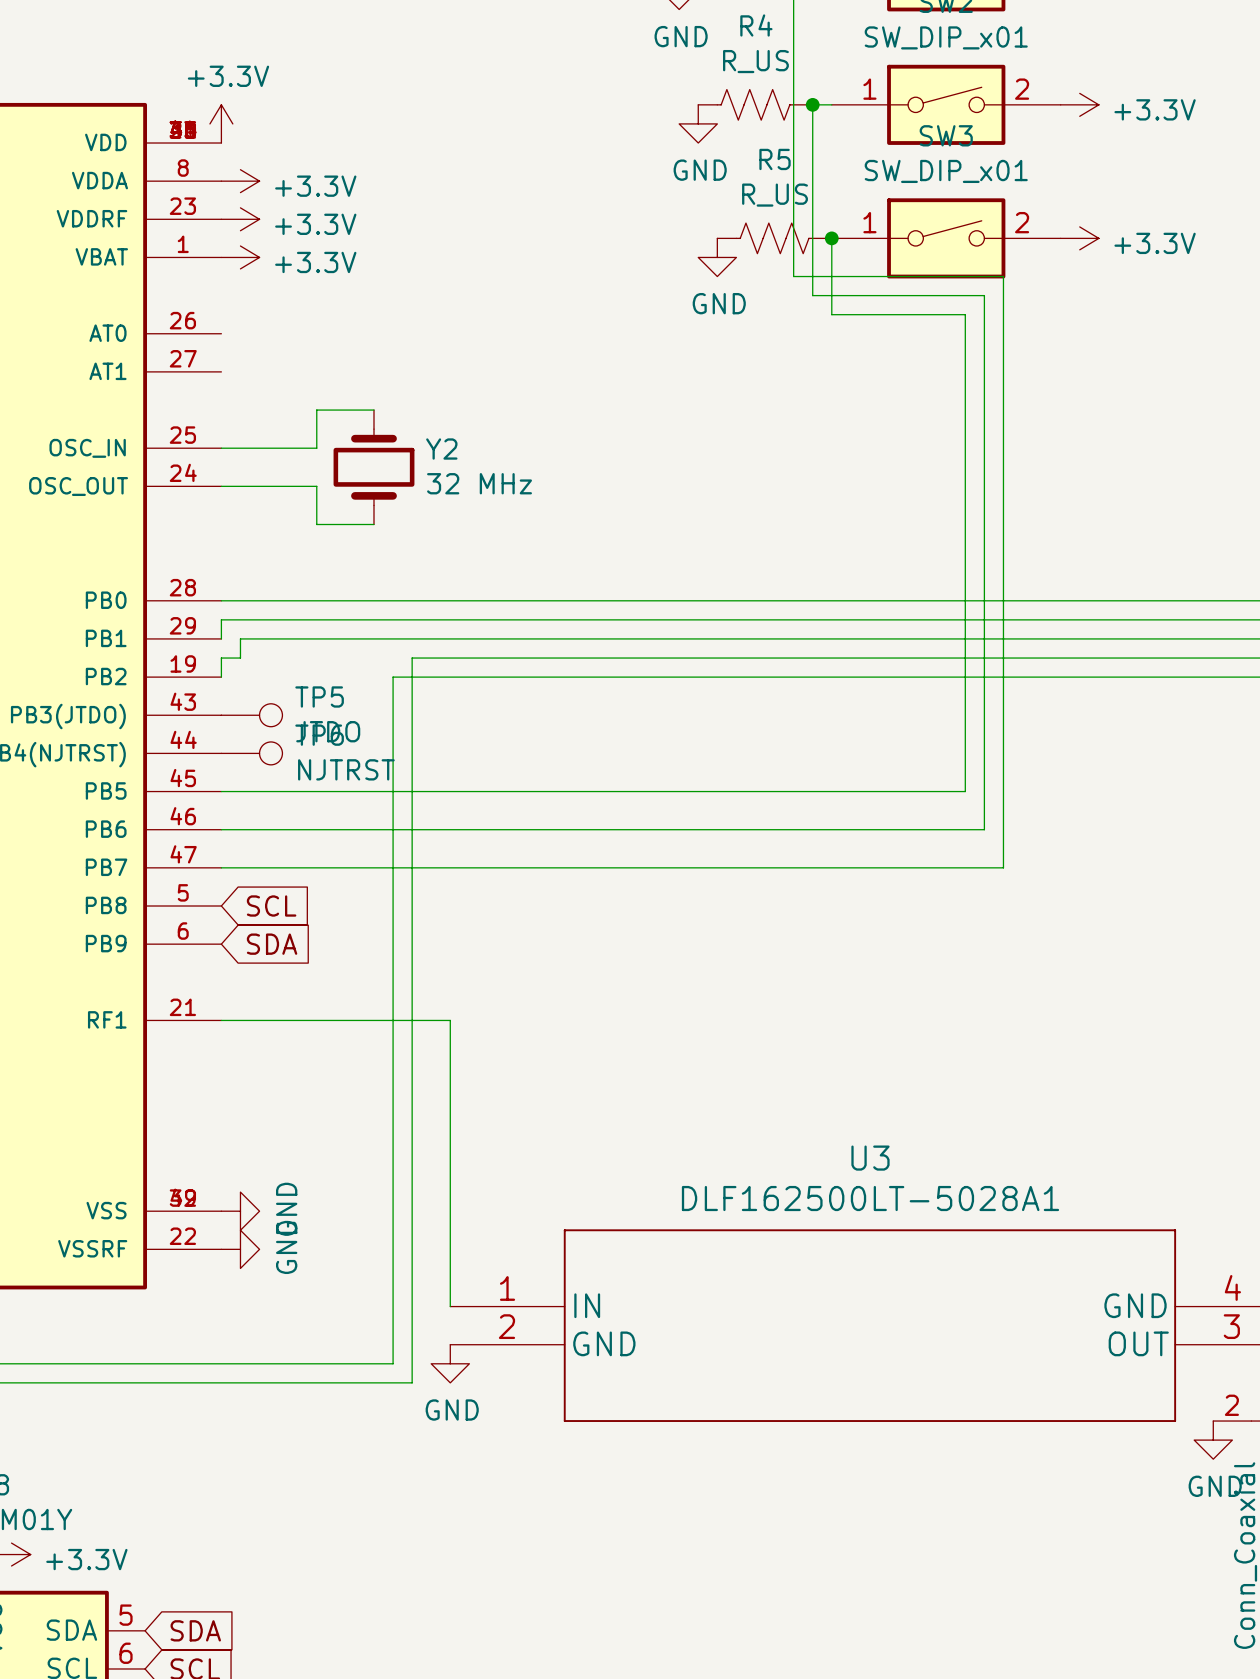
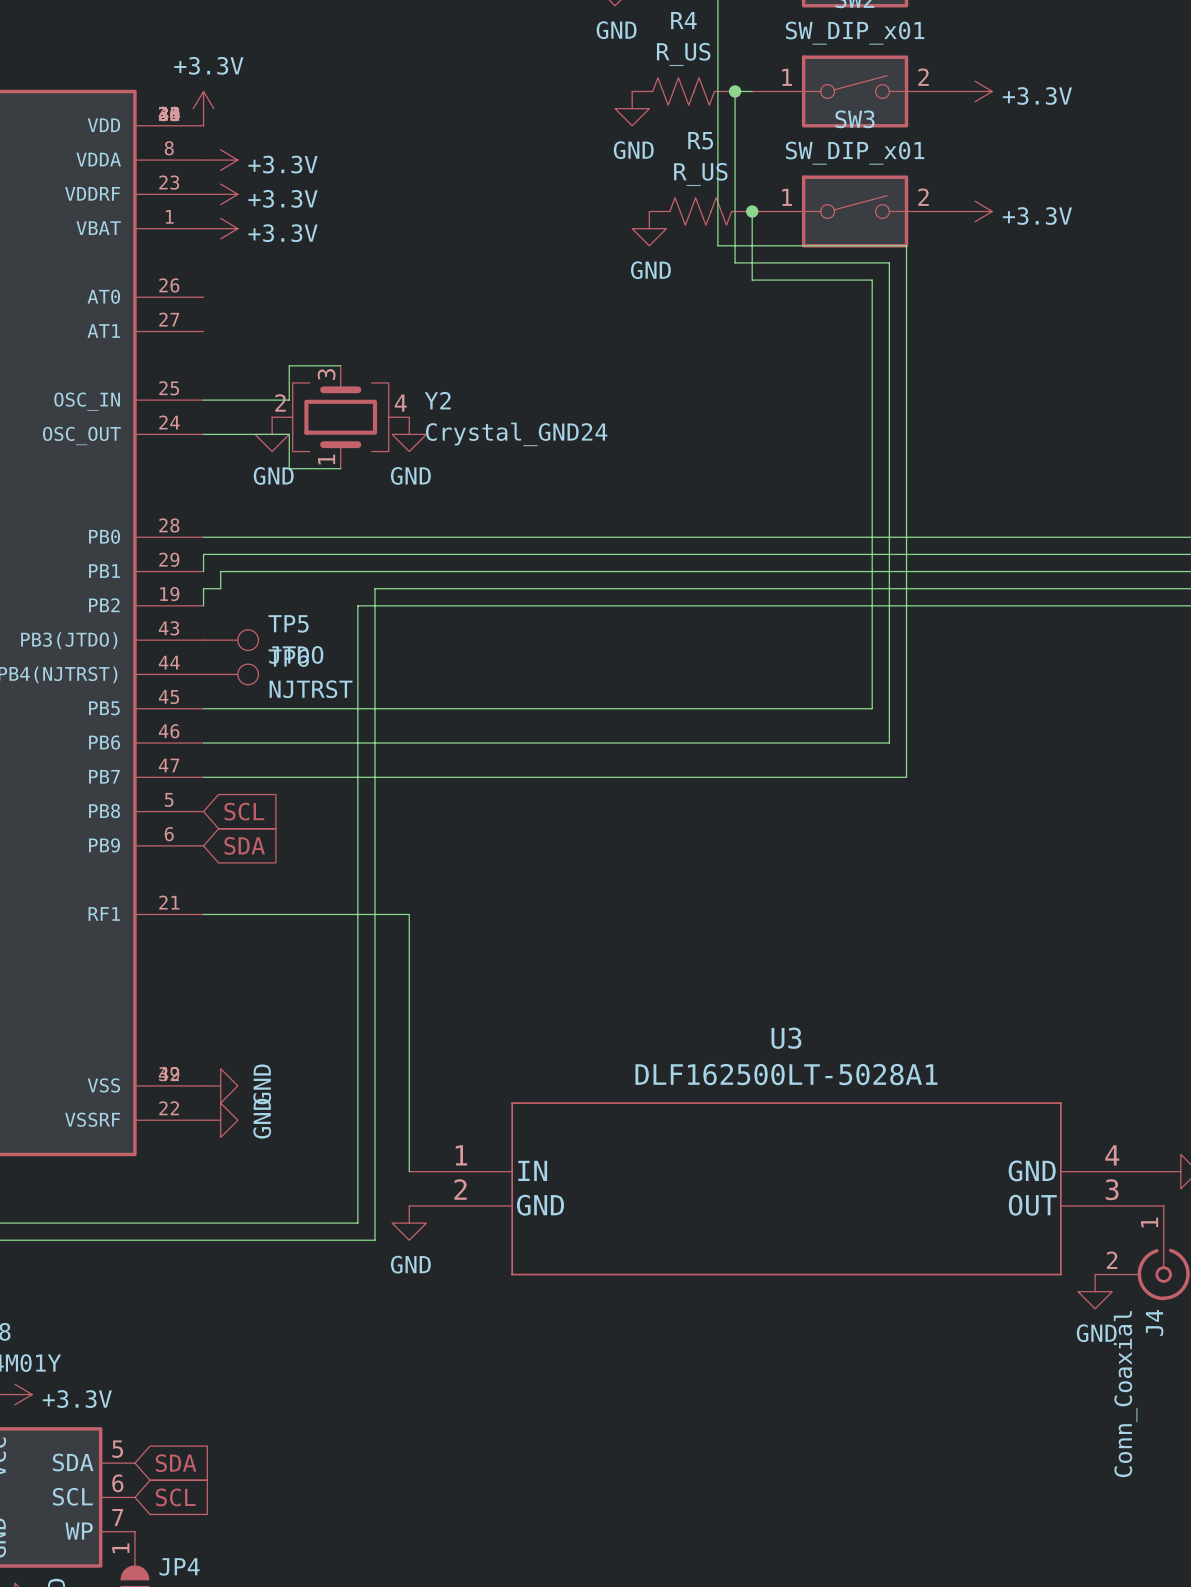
Y2 symbol: [333, 410, 415, 525] -> [272, 365, 410, 469]
Y2 name position: Y2 (441, 449) -> Y2 (437, 400)
Y2 value: 32 MHz (479, 483) -> Crystal_GND24 (516, 434)
power symbol: none -> GND (272, 434)
power symbol: none -> GND (409, 434)

